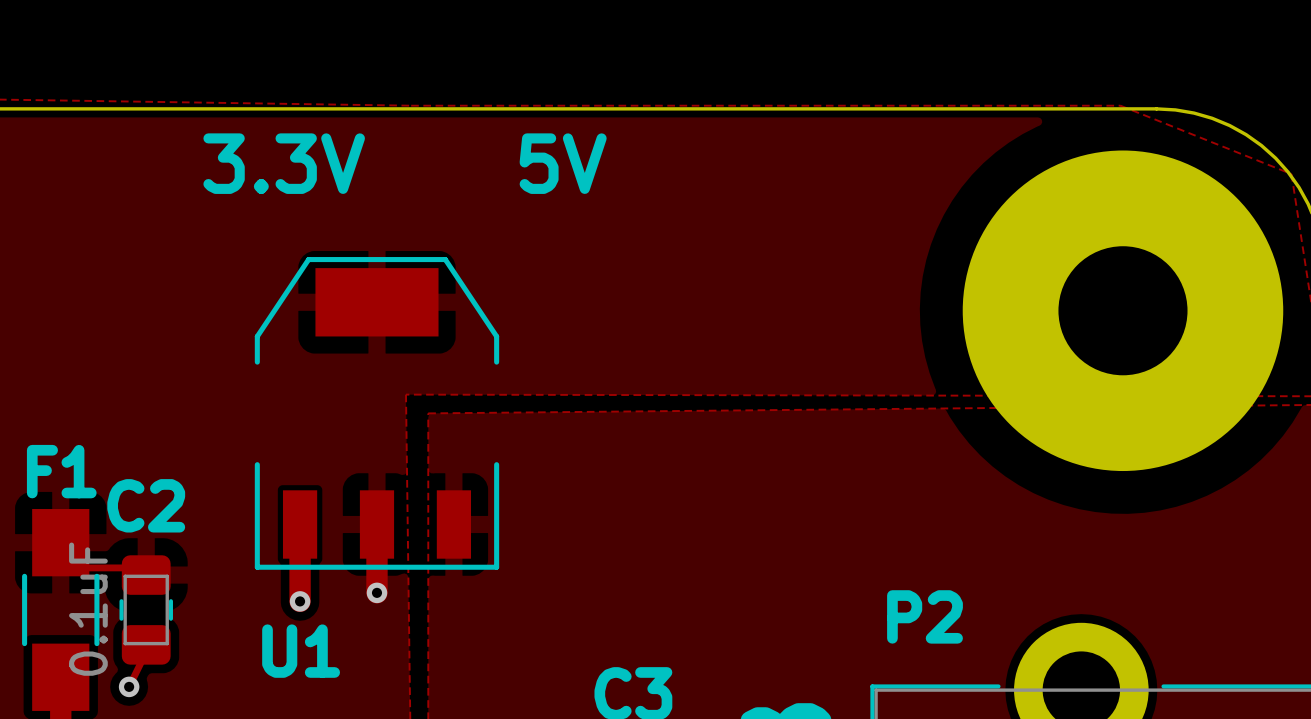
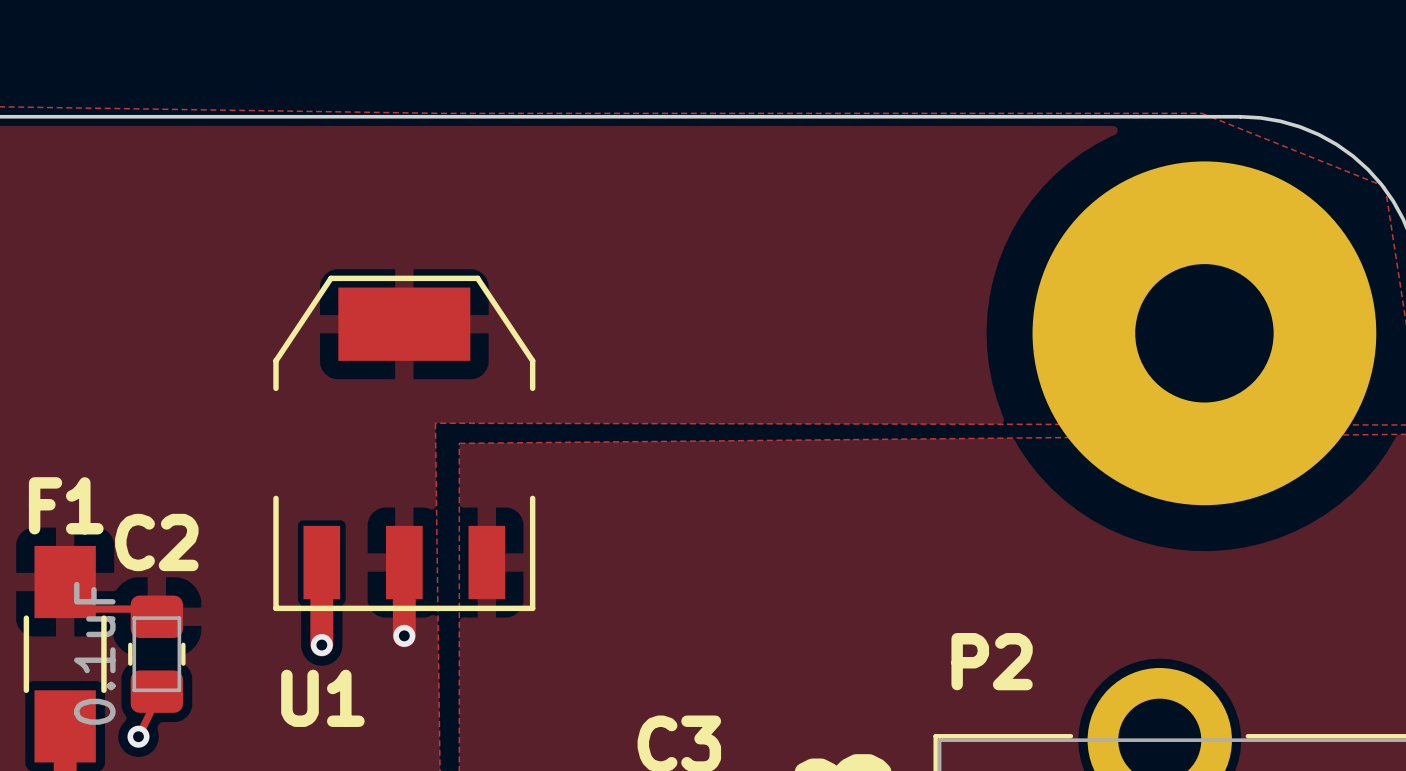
text: 3.3V (284, 163) -> none
text: 5V (563, 163) -> none

